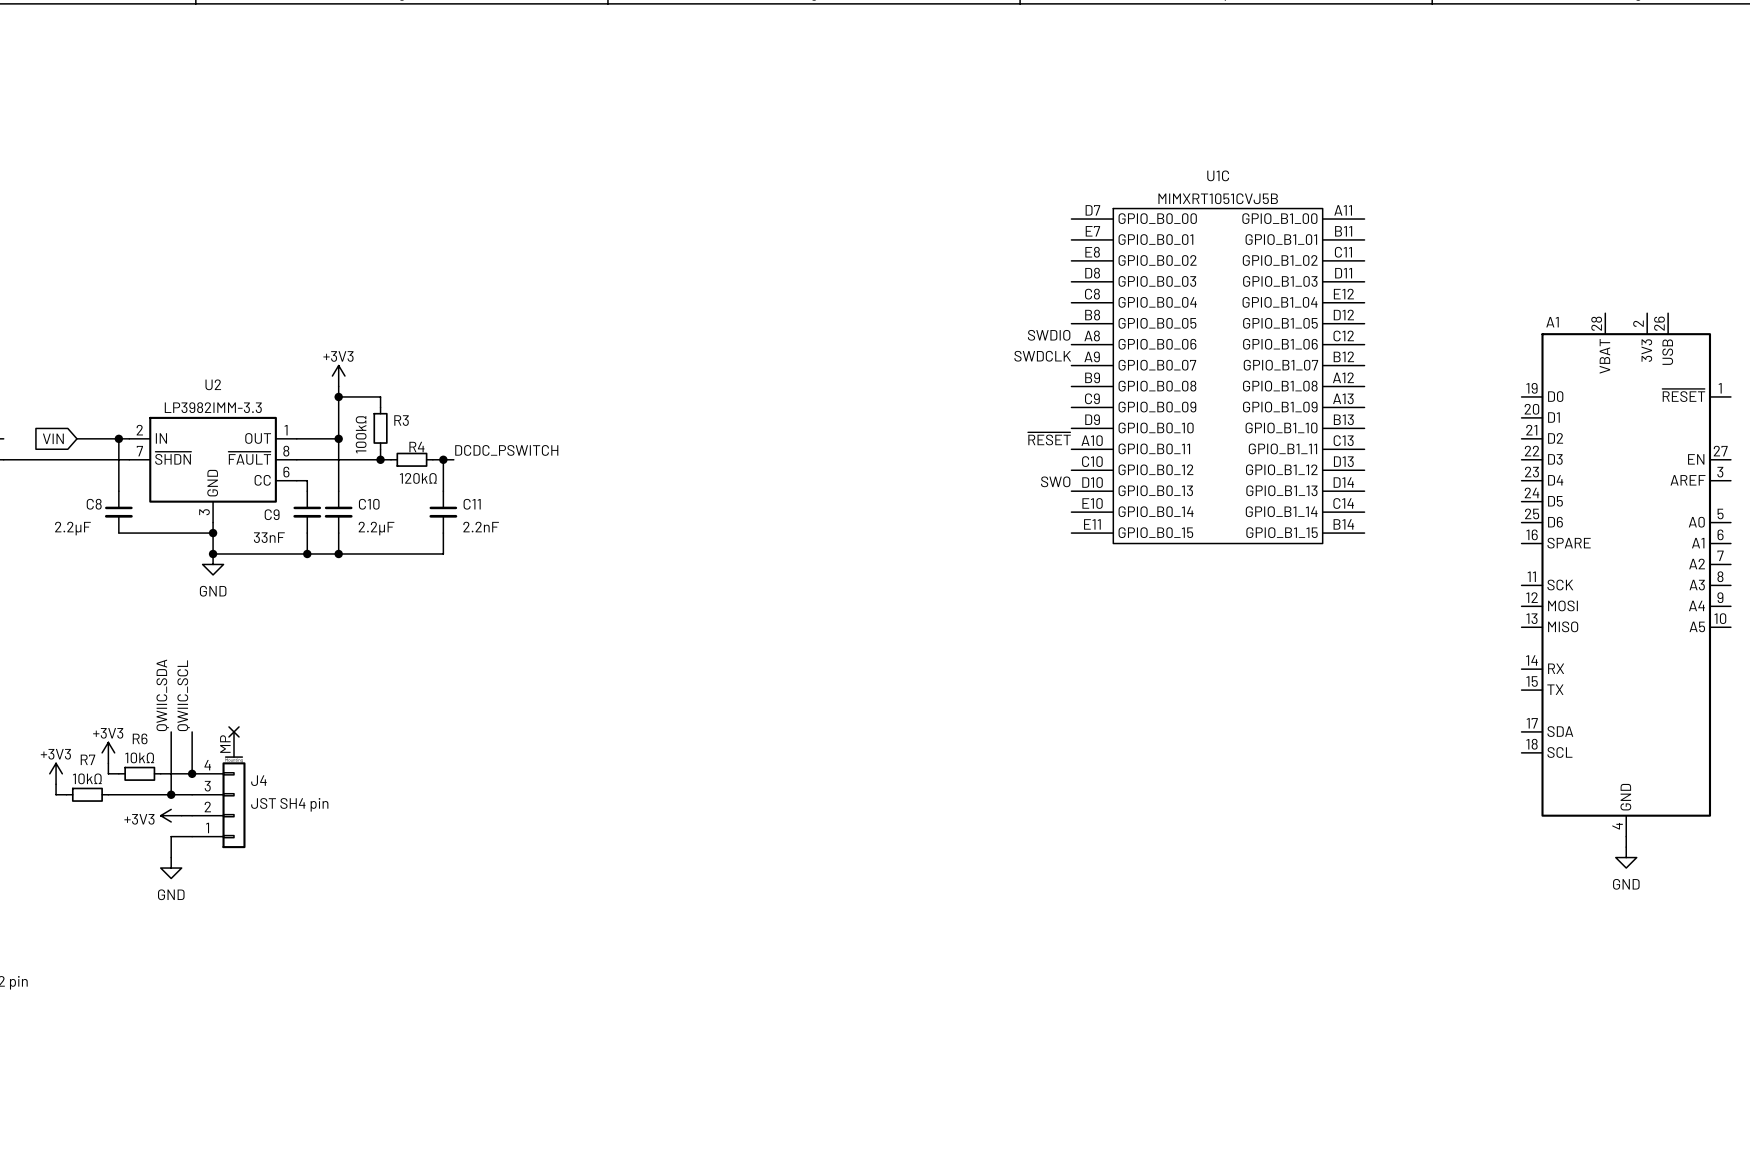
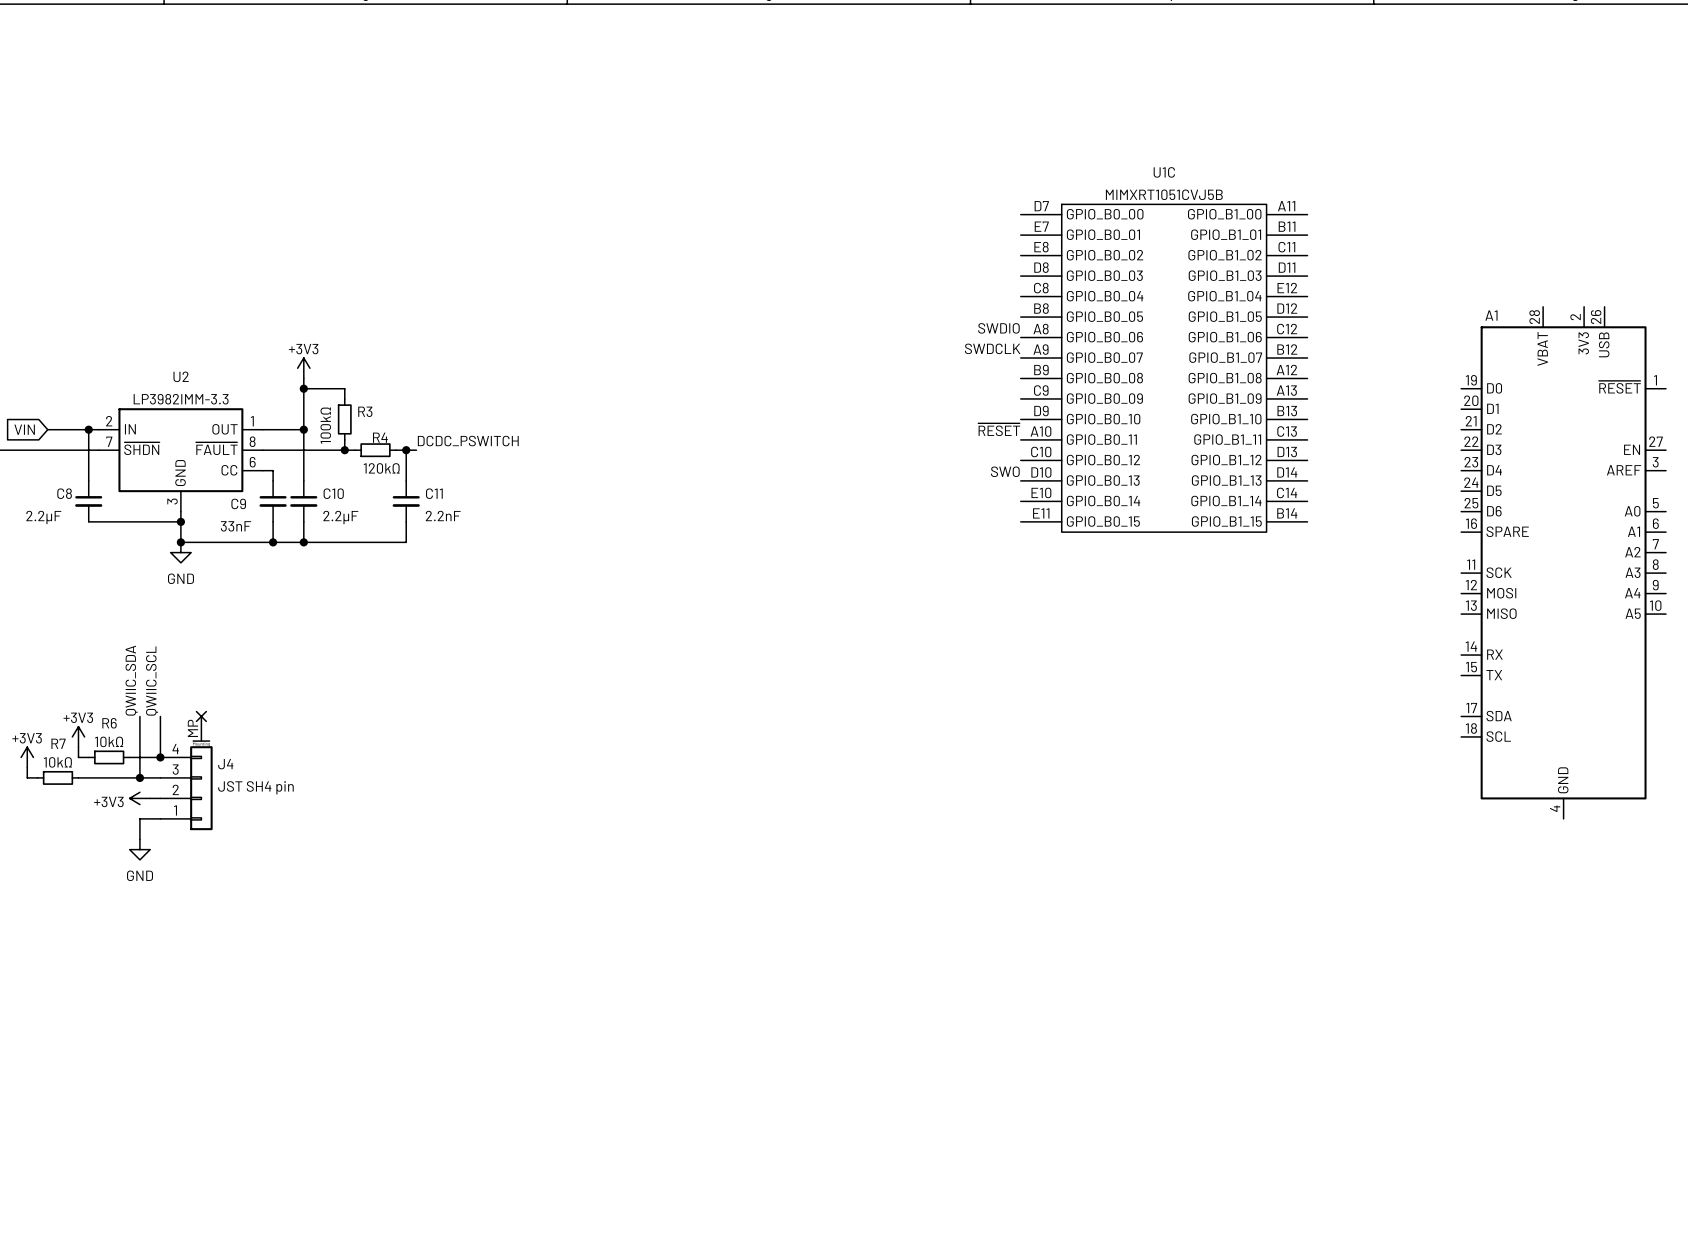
wire: (1626, 836) (1626, 847) -> none
power symbol: GND (1626, 857) -> none

